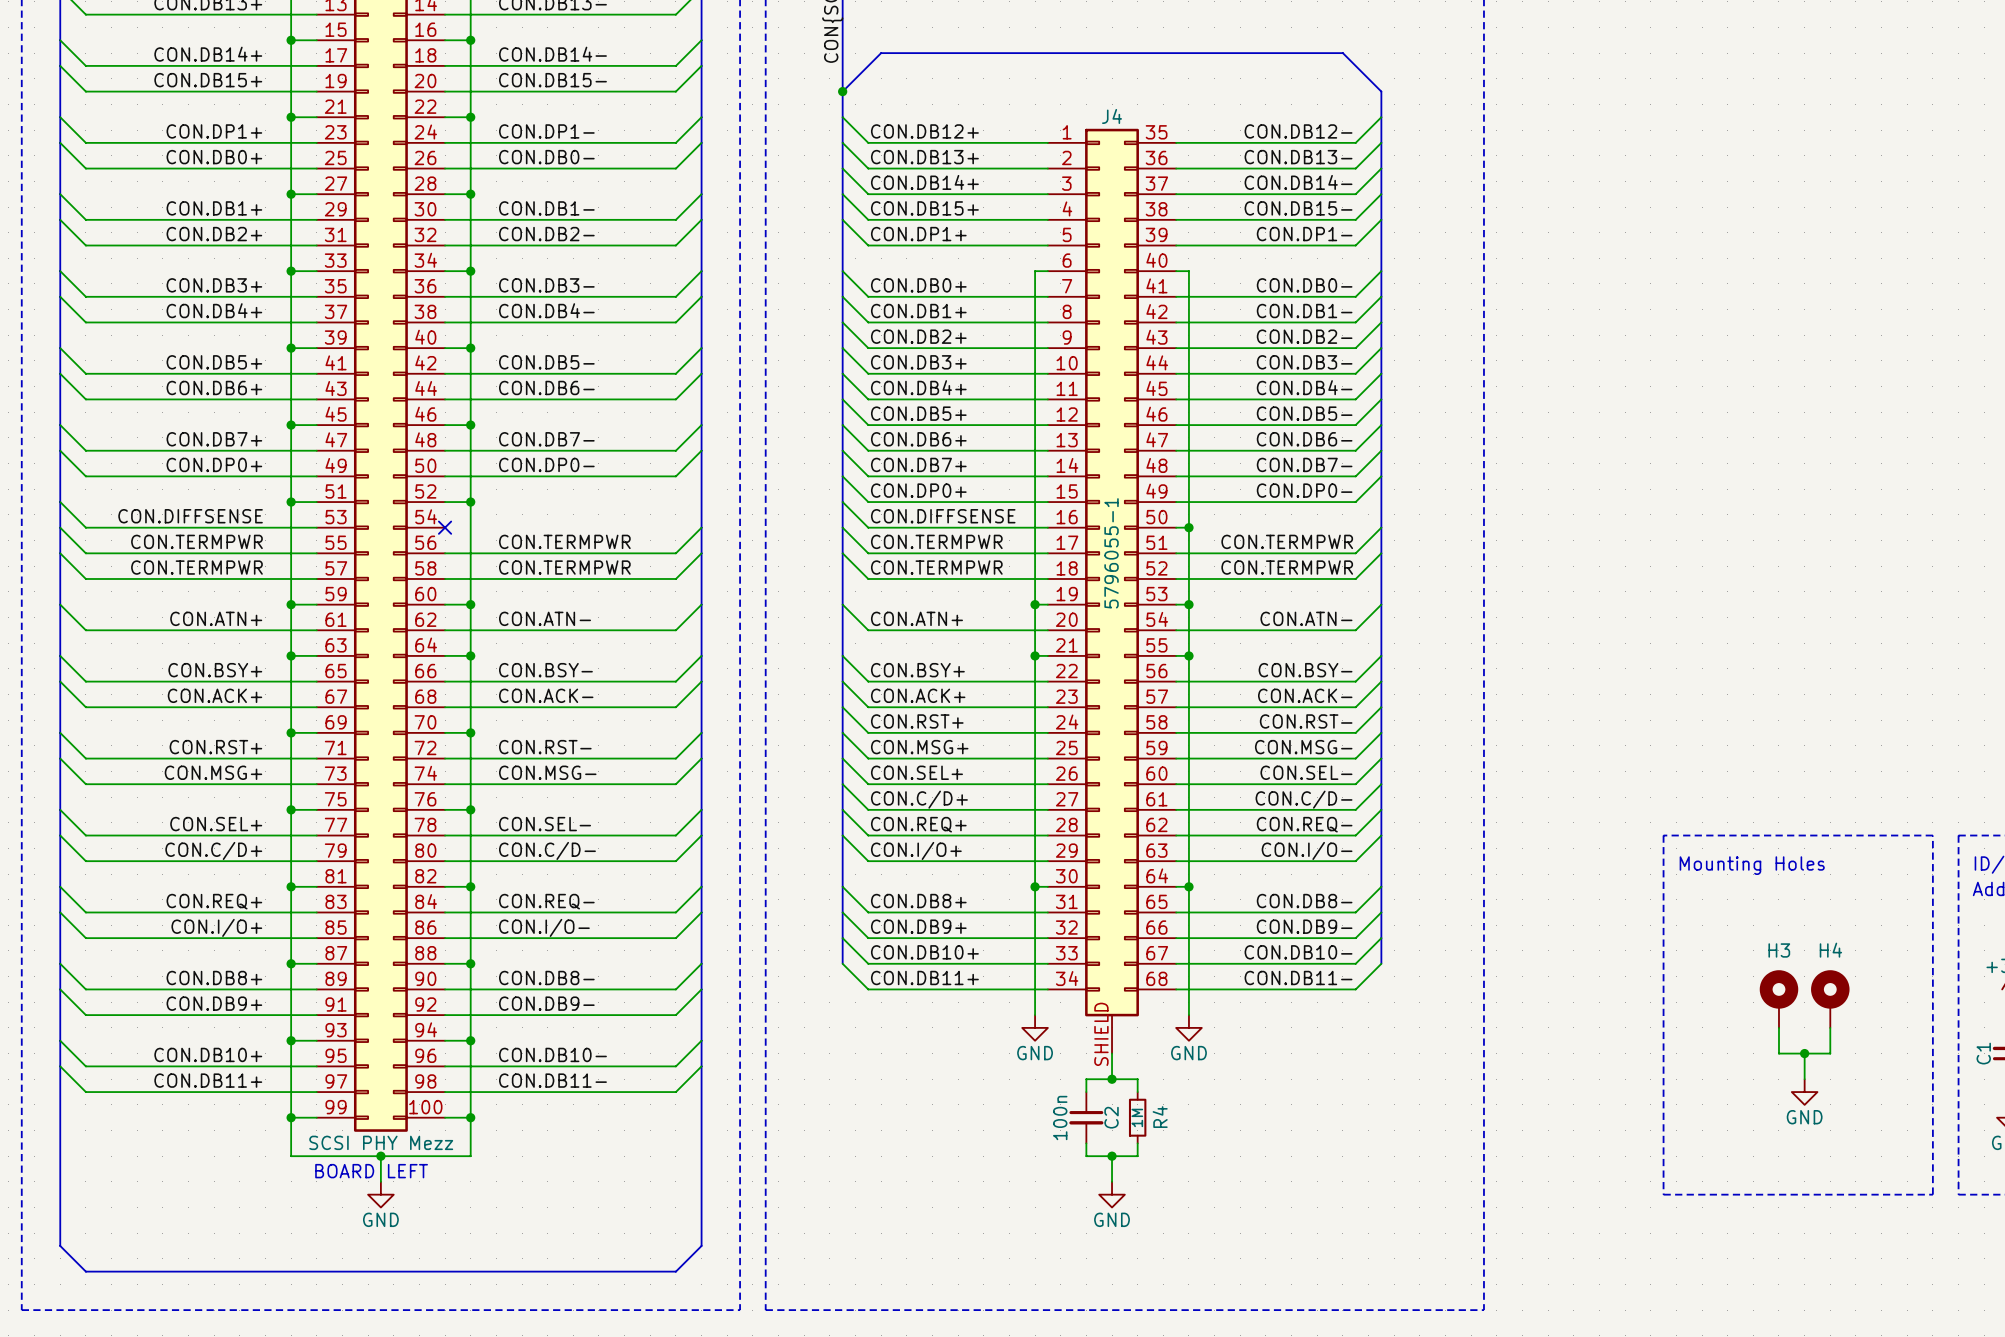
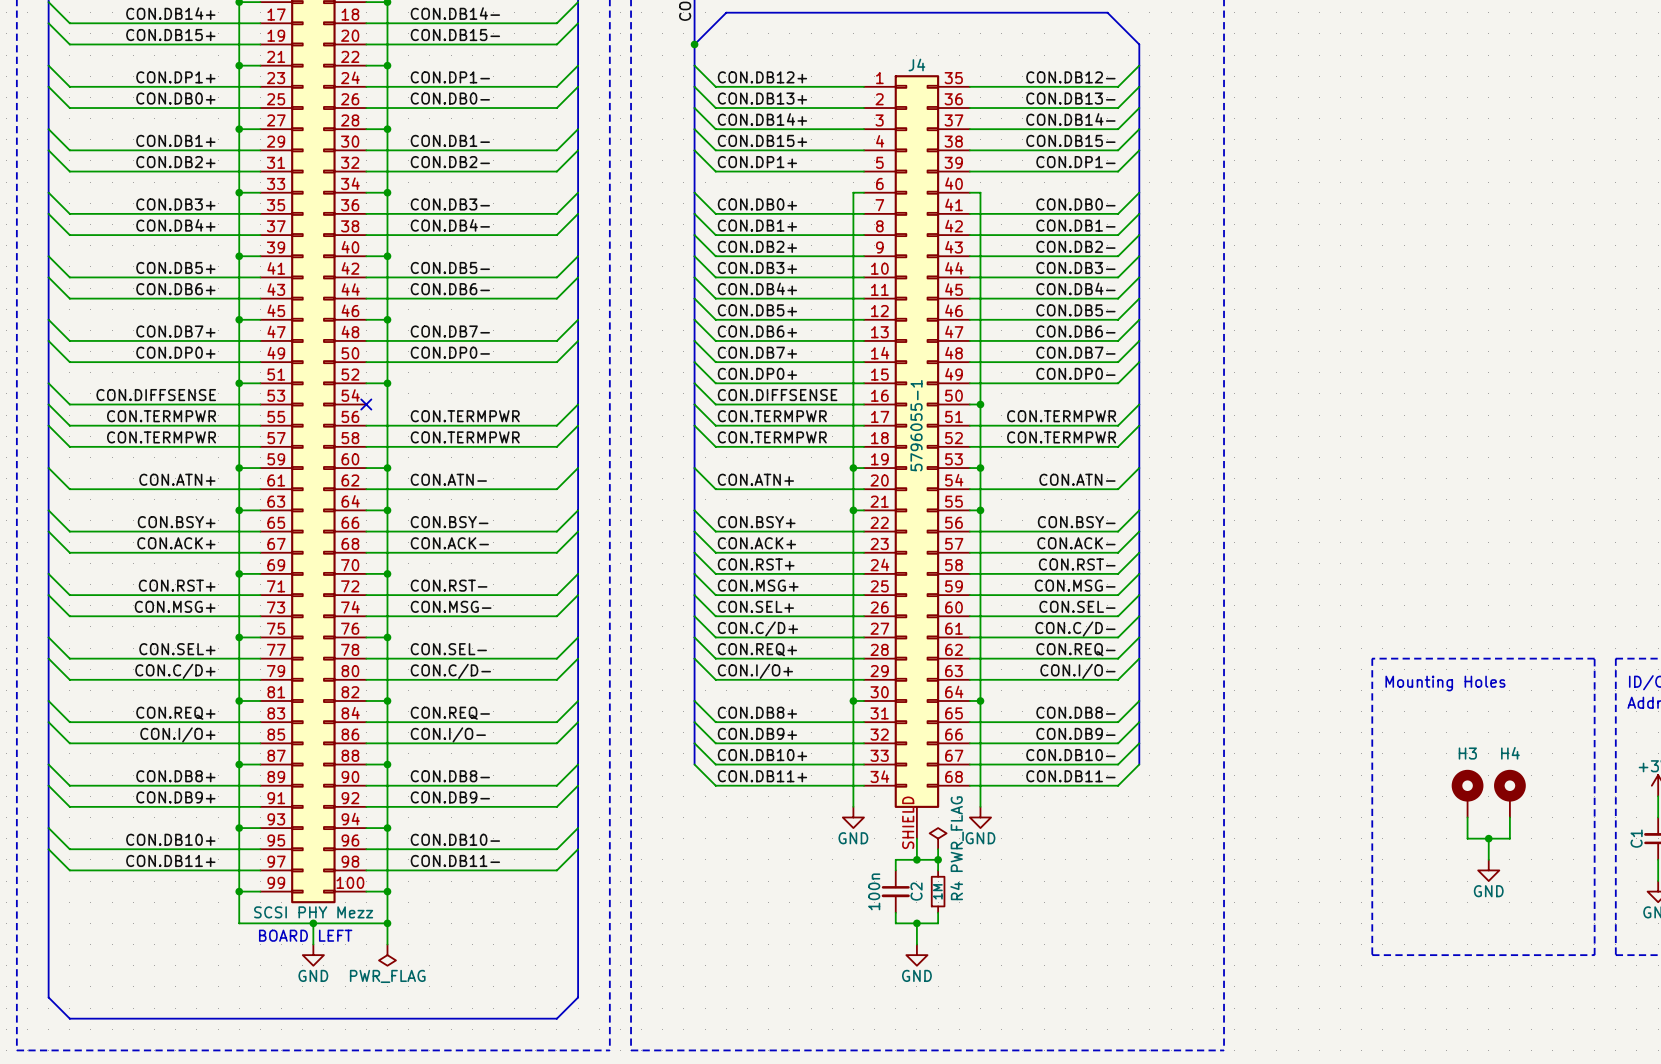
power symbol: none -> PWR_FLAG (938, 838)
wire: none -> (938, 849) (938, 859)
junction: none -> (938, 859)
wire: none -> (387, 923) (387, 944)
junction: none -> (387, 923)
power symbol: none -> PWR_FLAG (387, 955)

